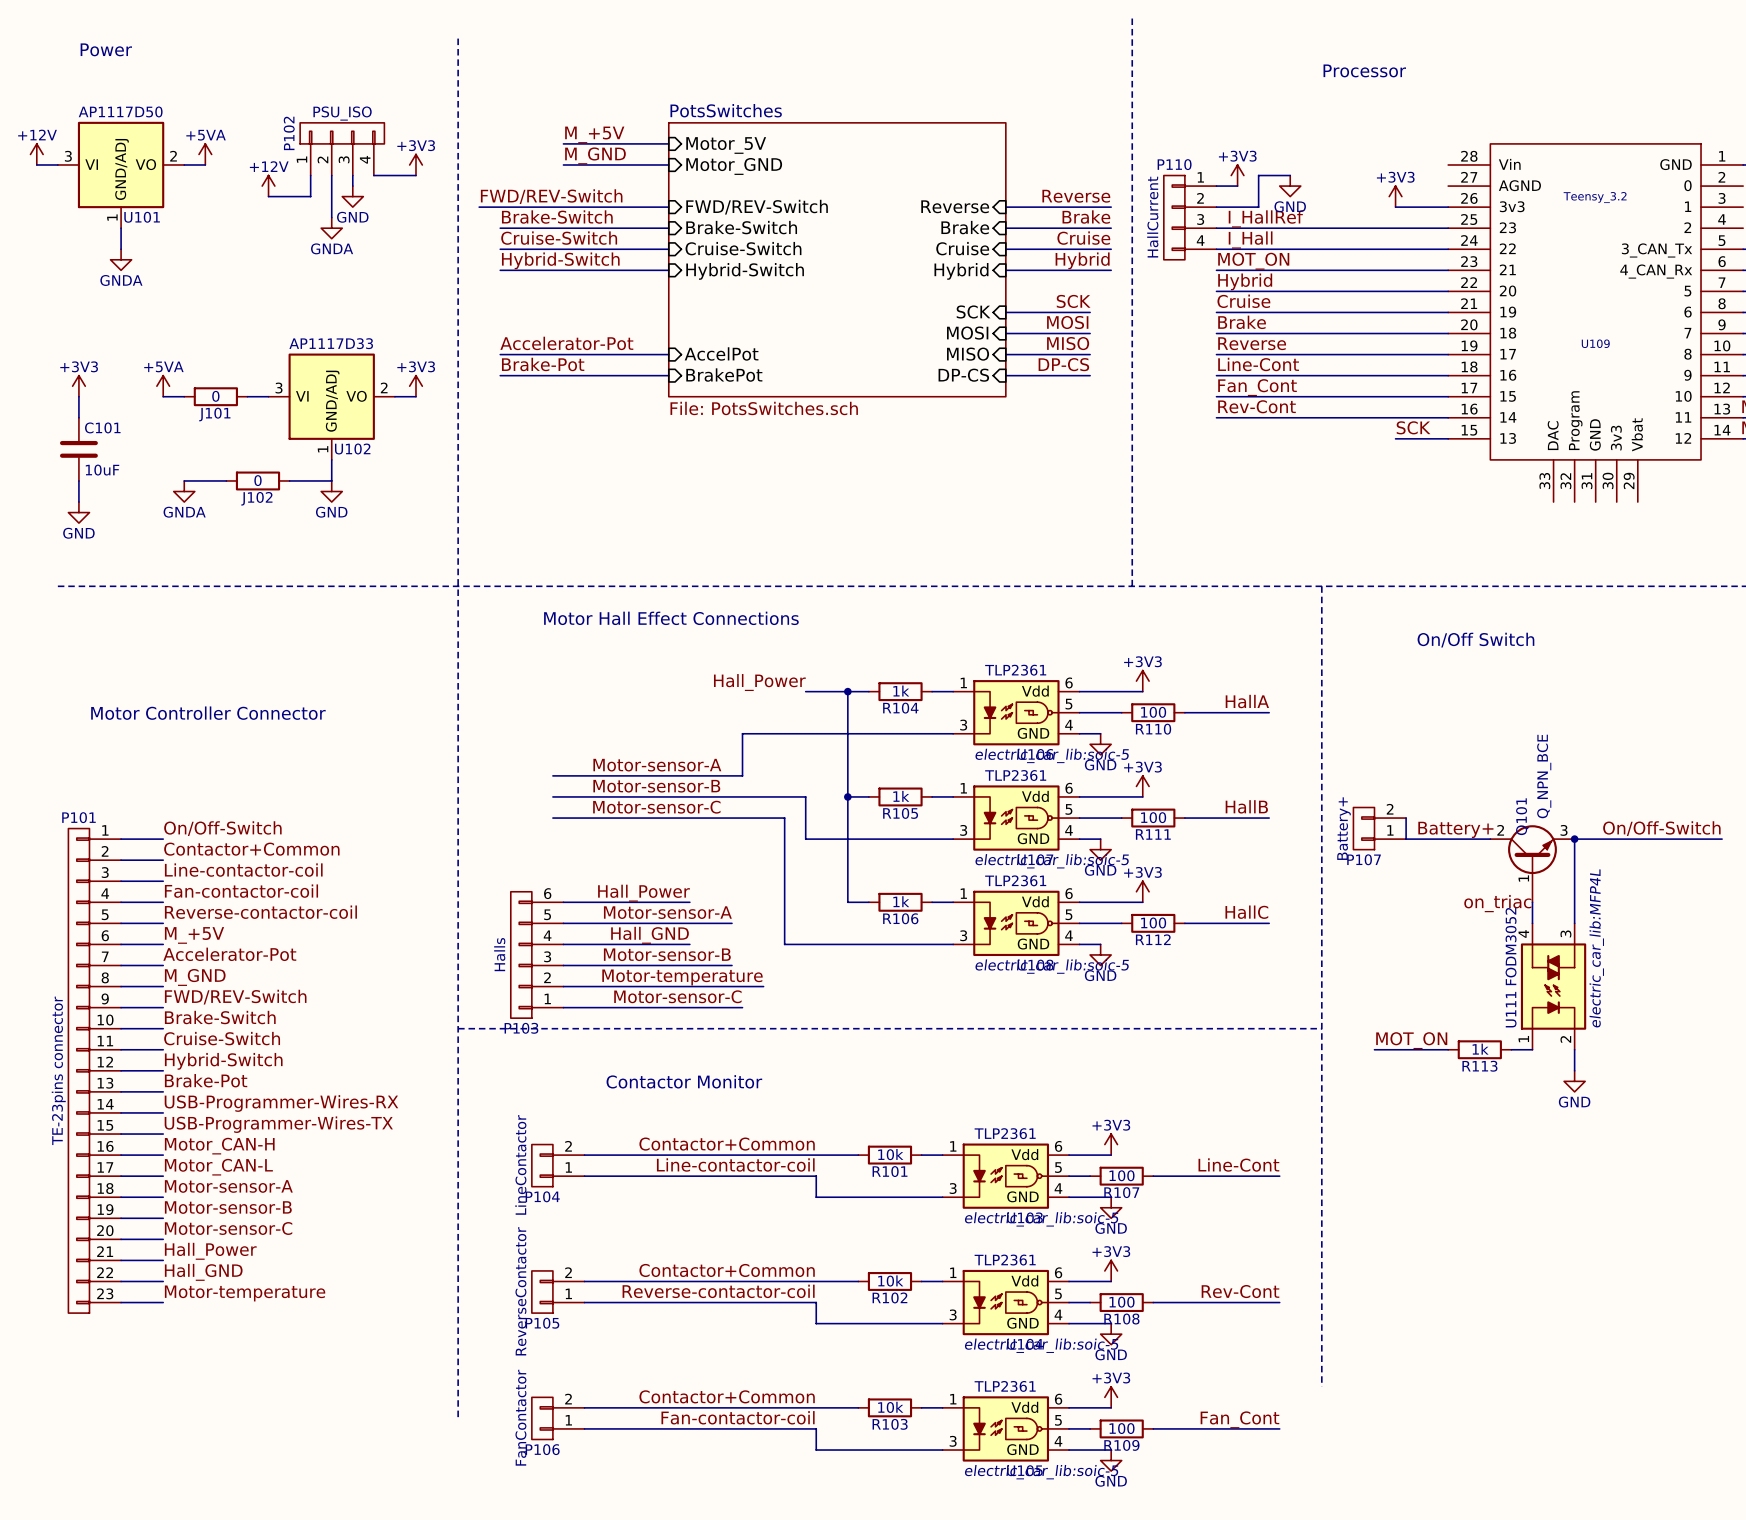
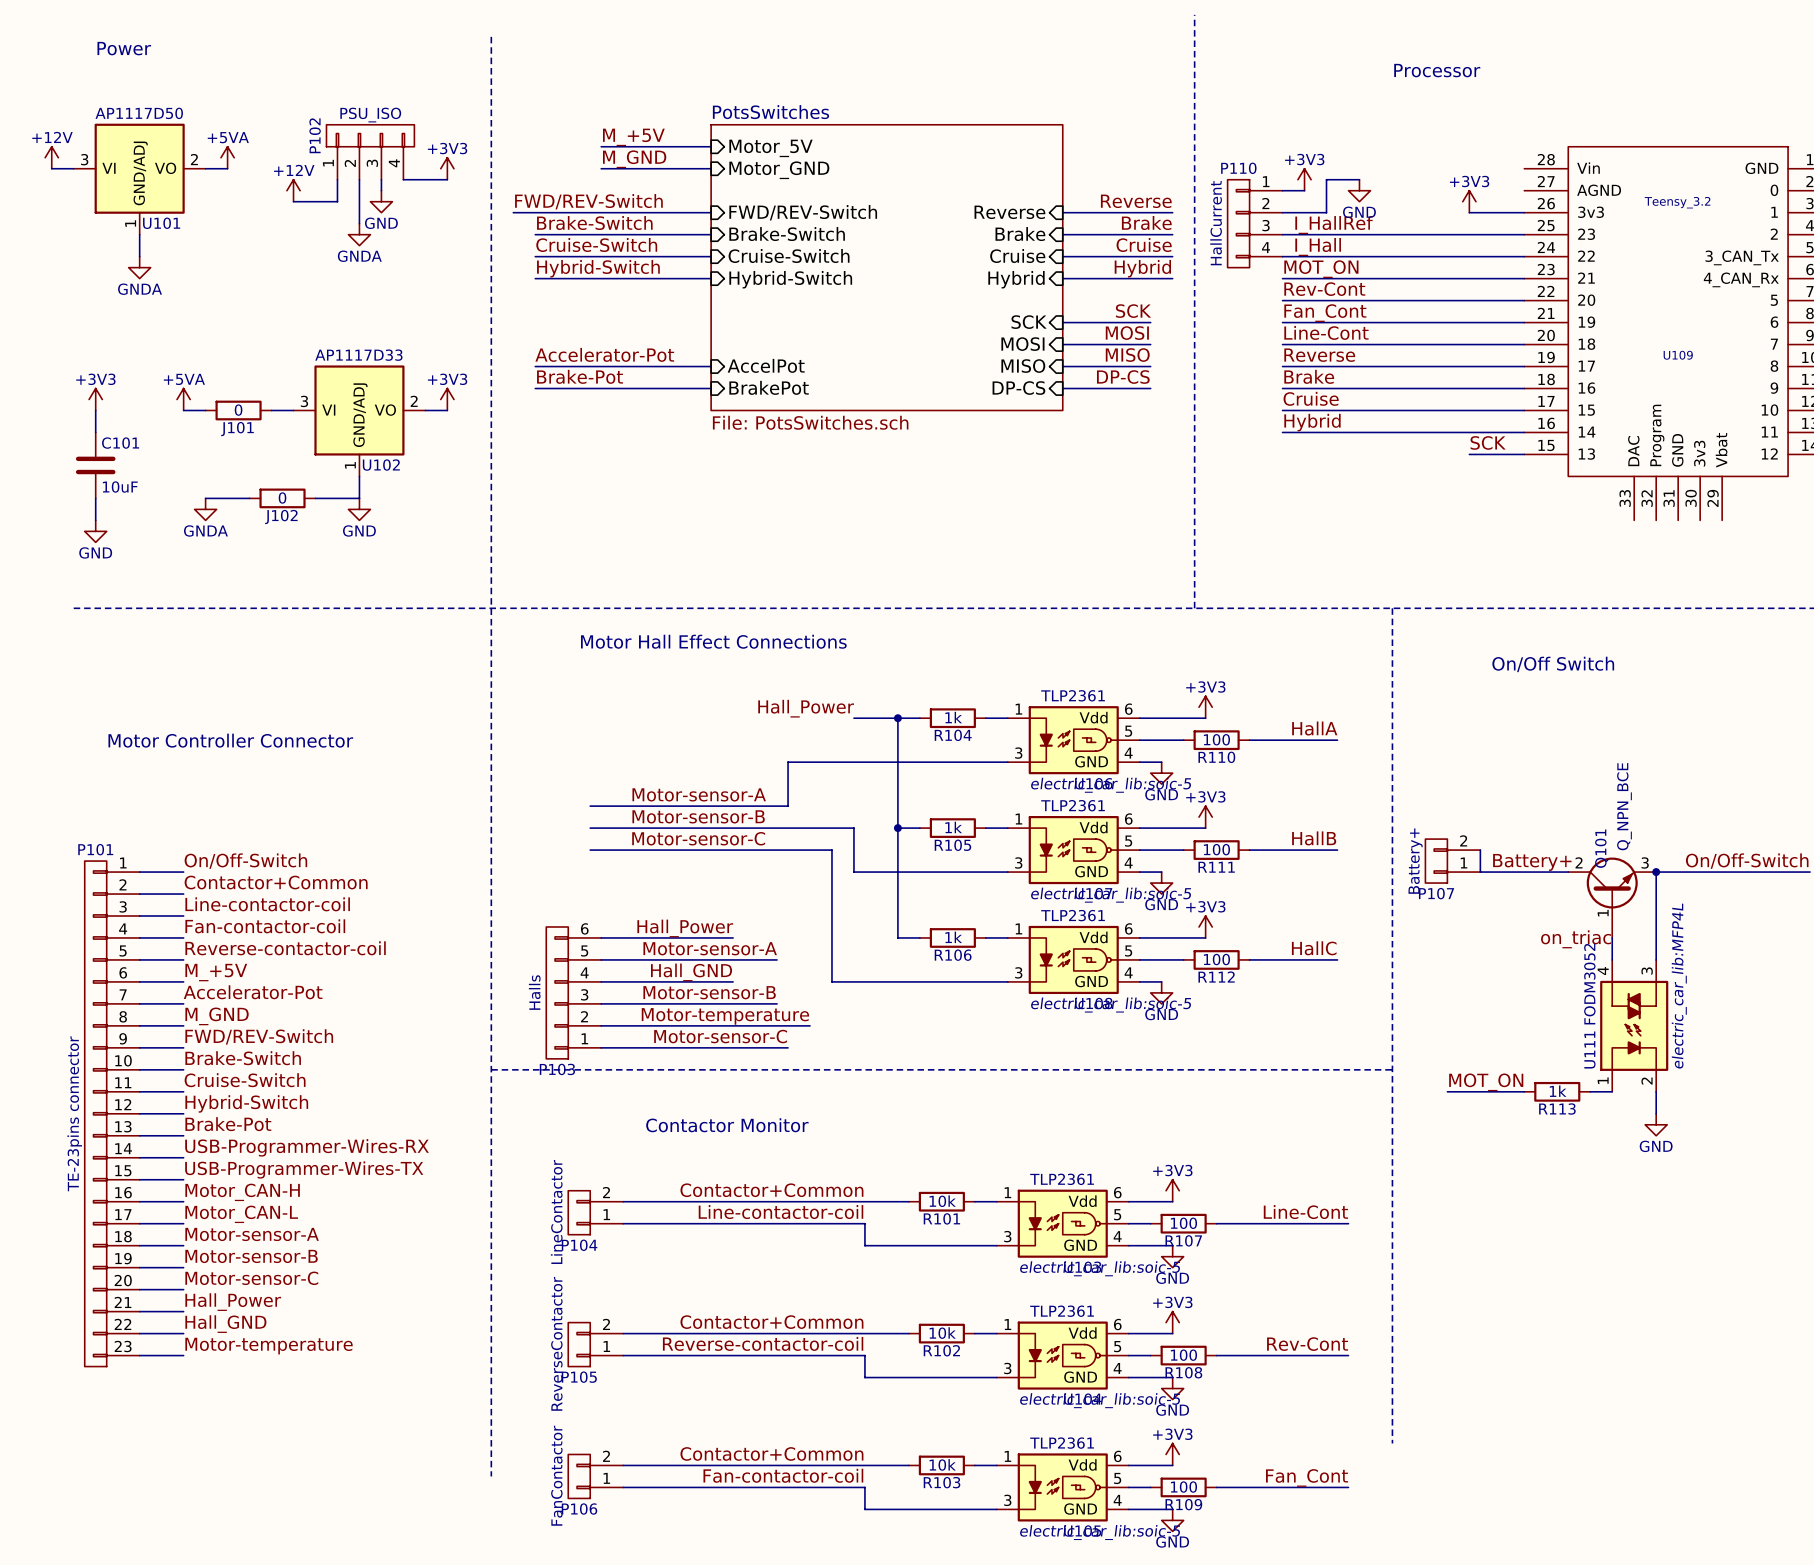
label: Hybrid (1245, 281) -> Rev-Cont (1324, 289)
label: Cruise (1243, 301) -> Fan_Cont (1325, 313)
label: Brake (1242, 322) -> Line-Cont (1326, 332)
label: Line-Cont (1258, 364) -> Brake (1309, 376)
label: Fan_Cont (1257, 387) -> Cruise (1311, 398)
label: Rev-Cont (1257, 406) -> Hybrid (1312, 422)

